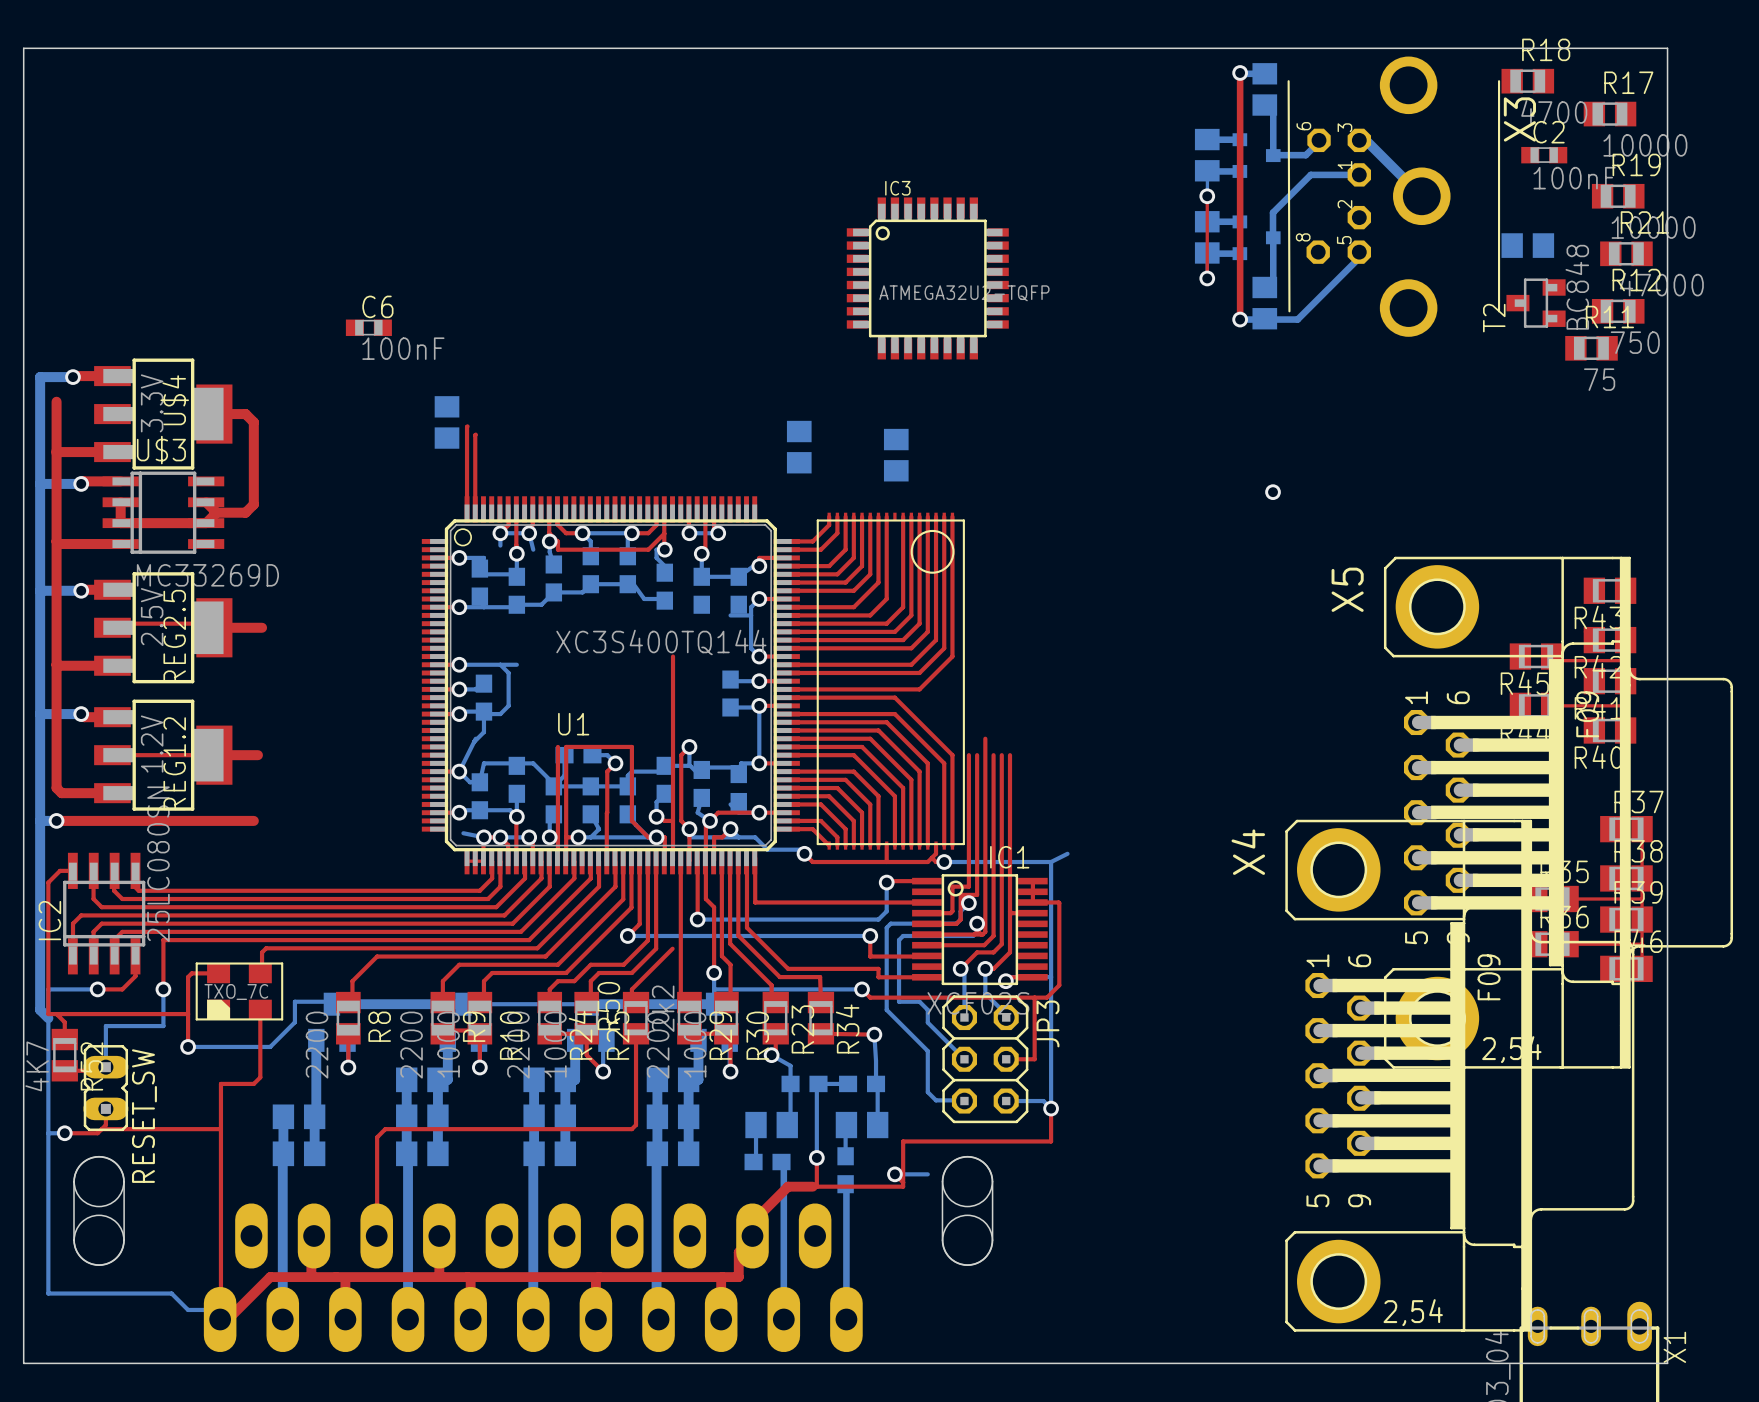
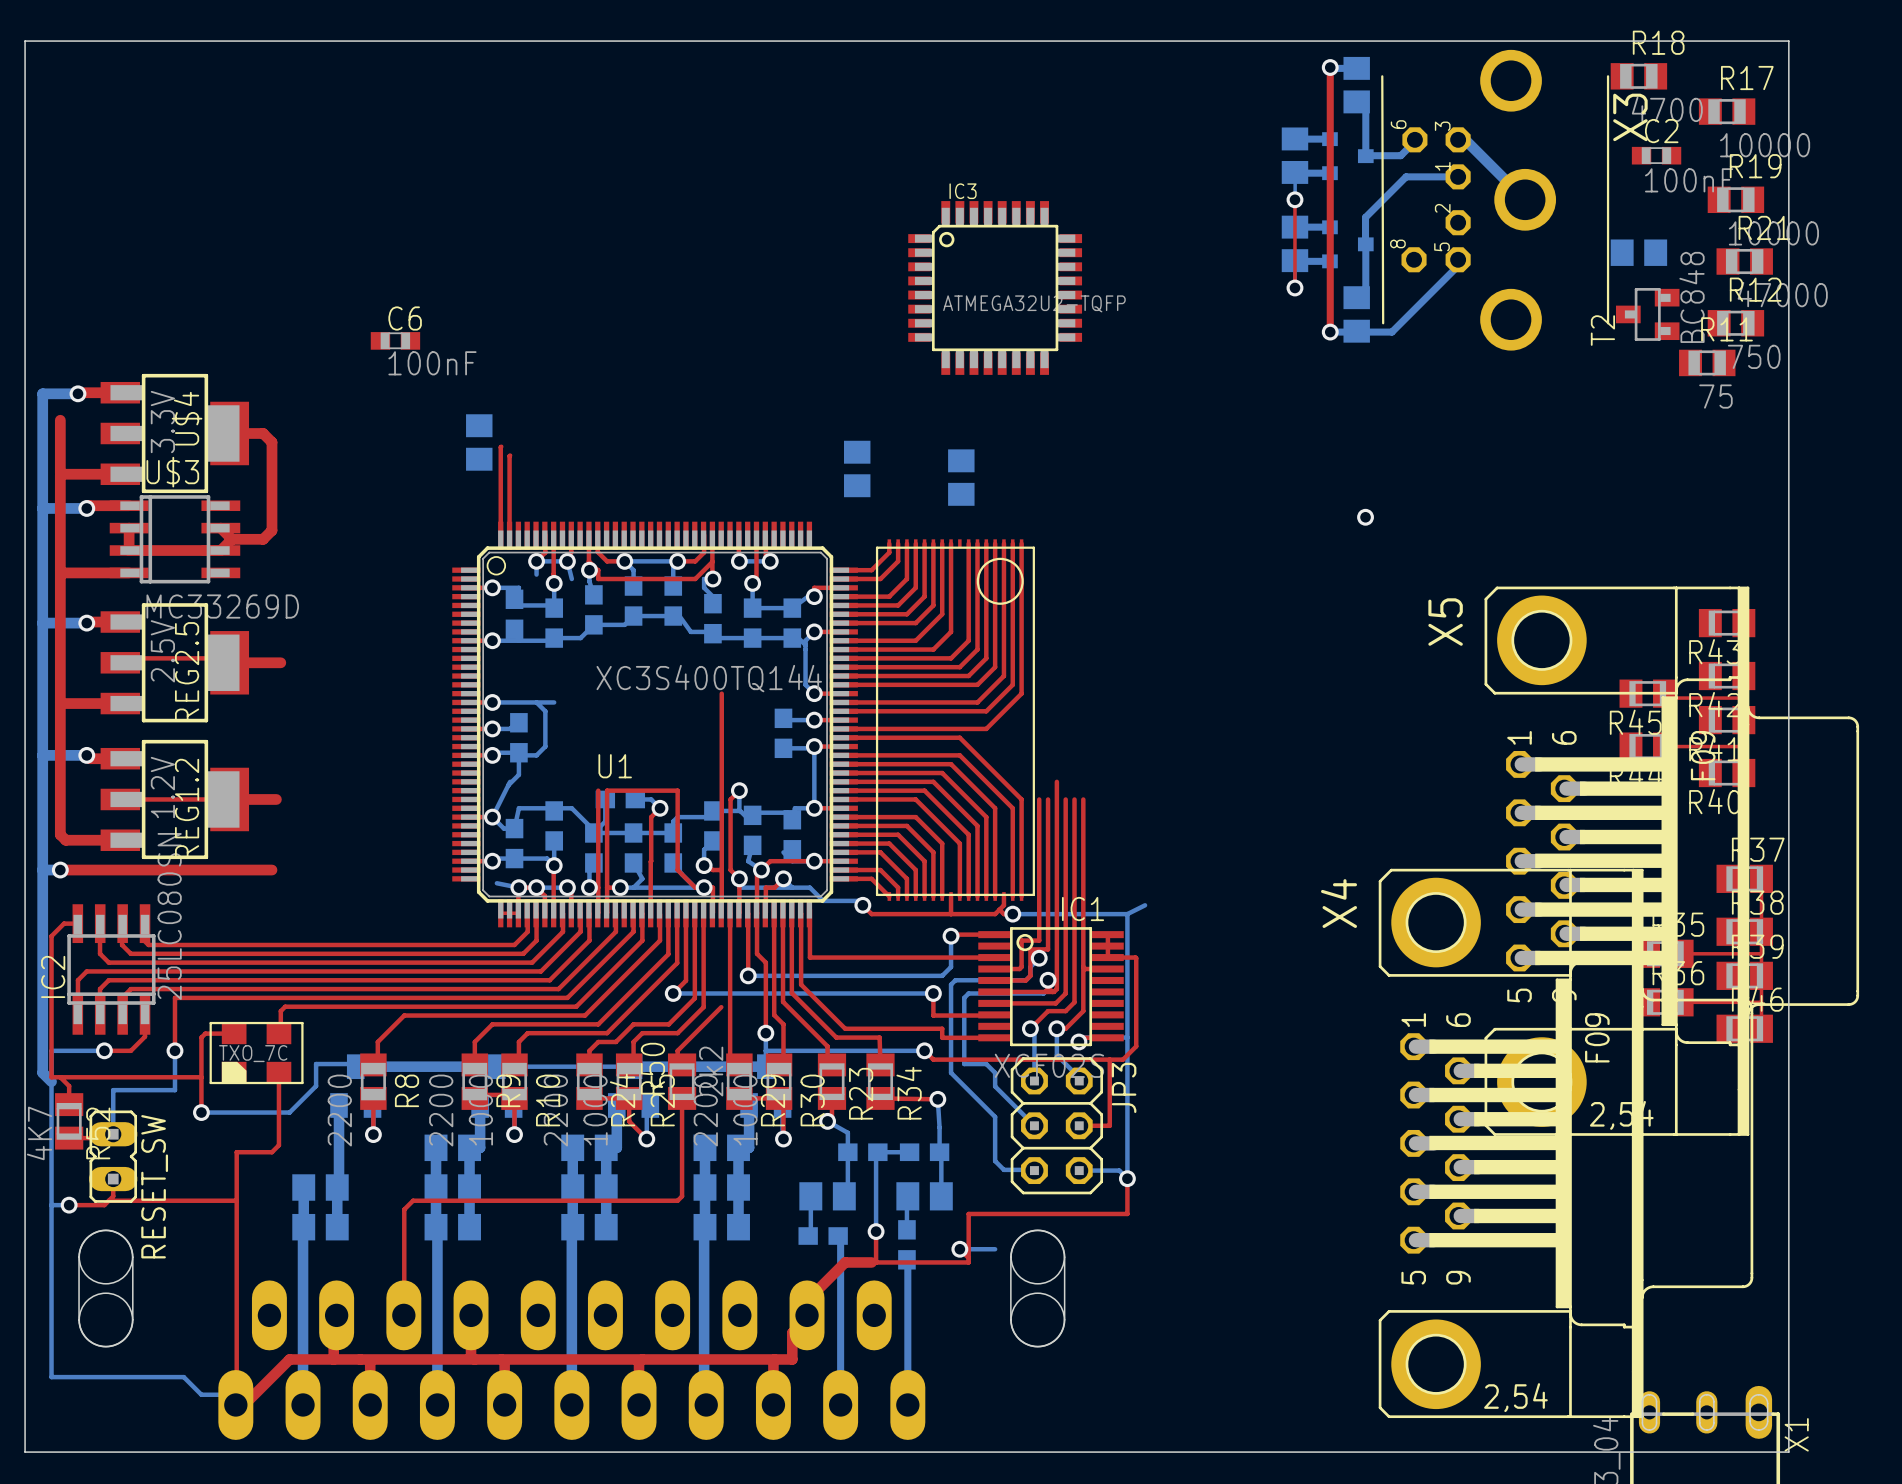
bottom track: none -> (712, 631) (719, 638) (798, 638) (805, 645)
bottom track: (730, 615) (751, 615) -> none

